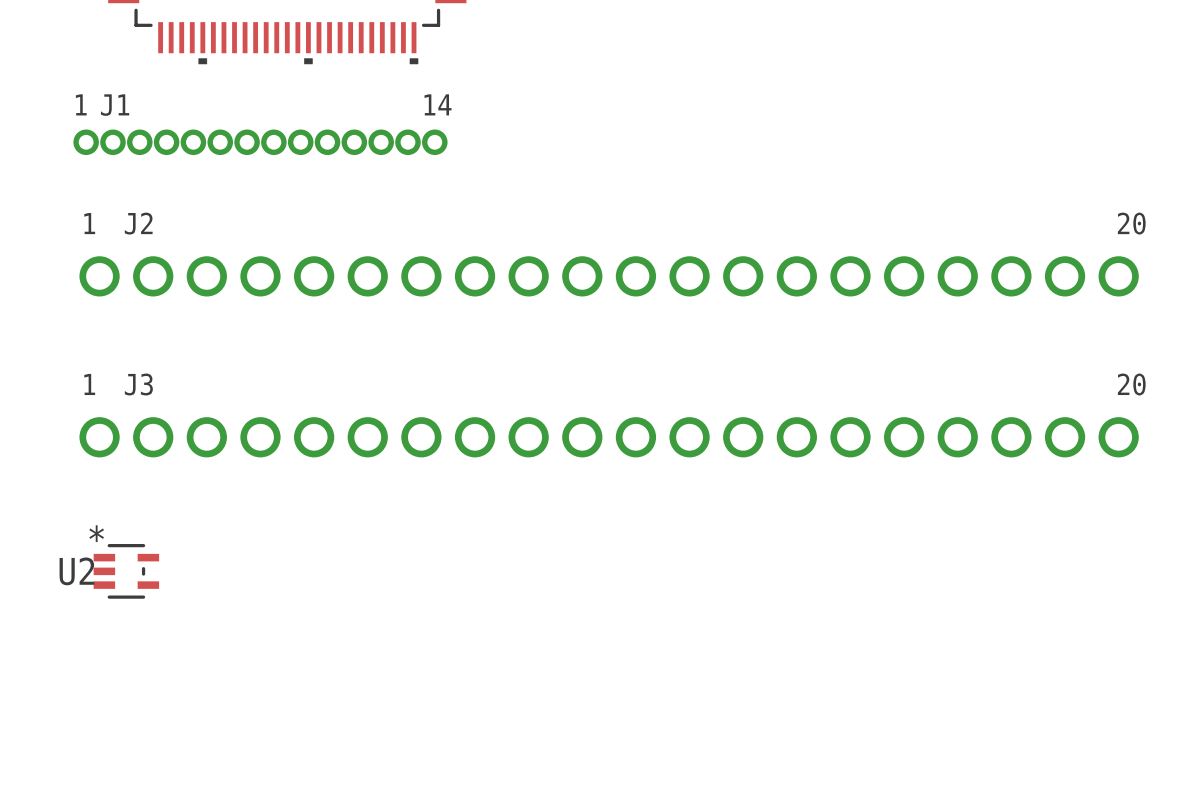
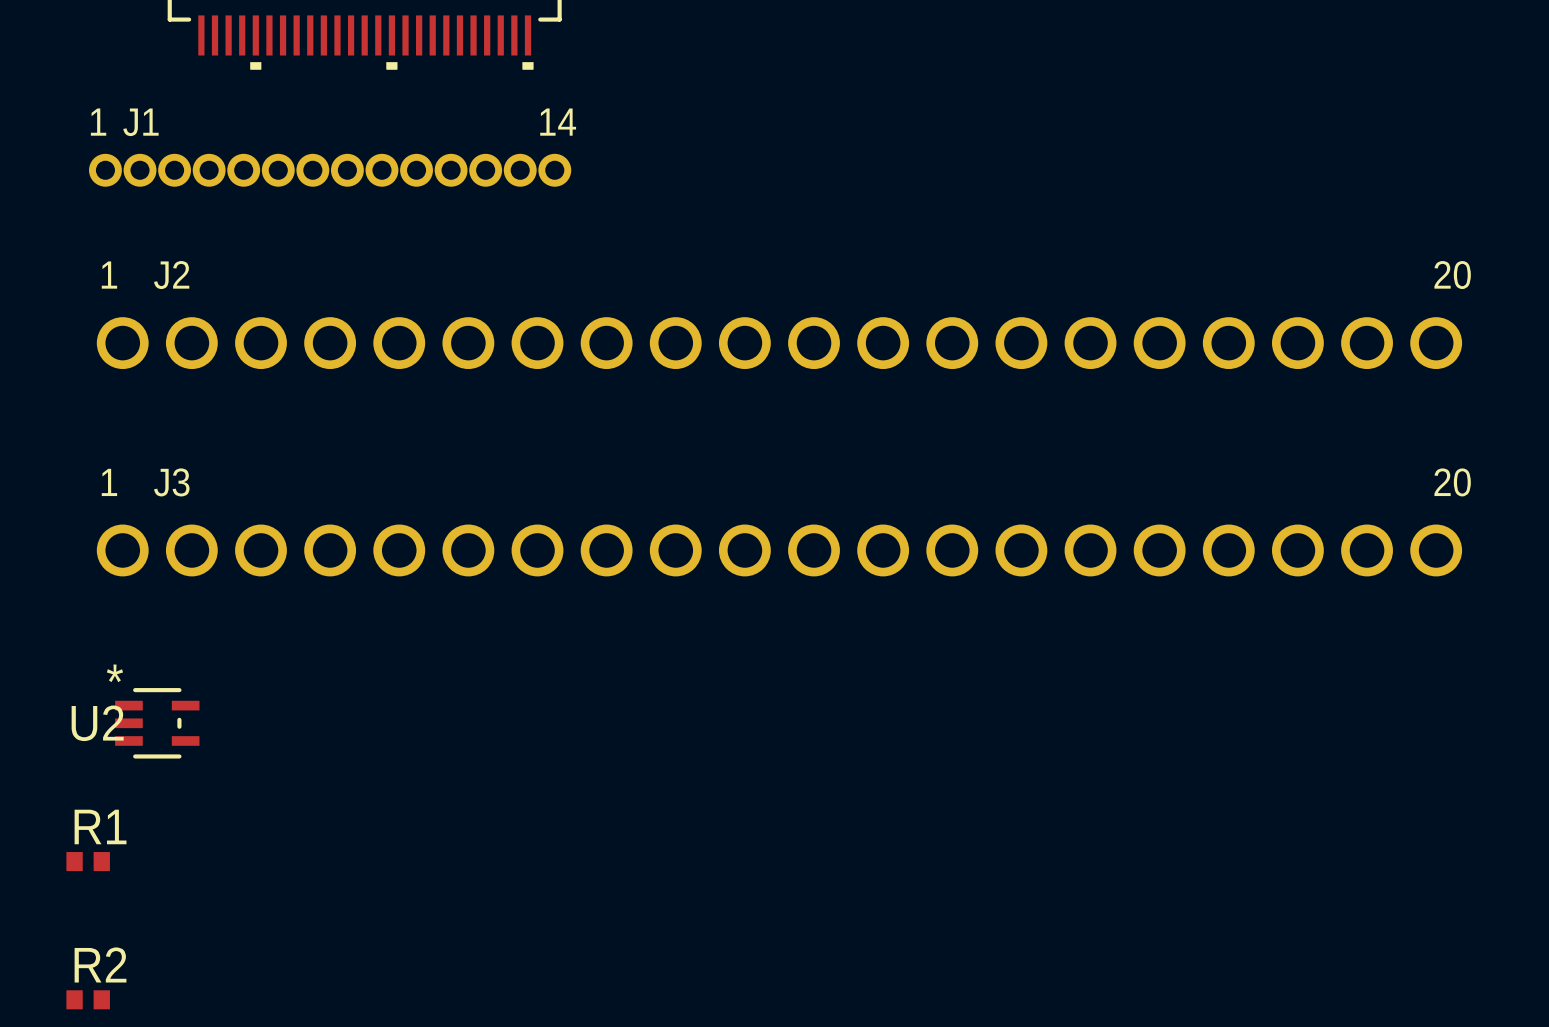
R1: none -> (88, 861)
R2: none -> (88, 999)

